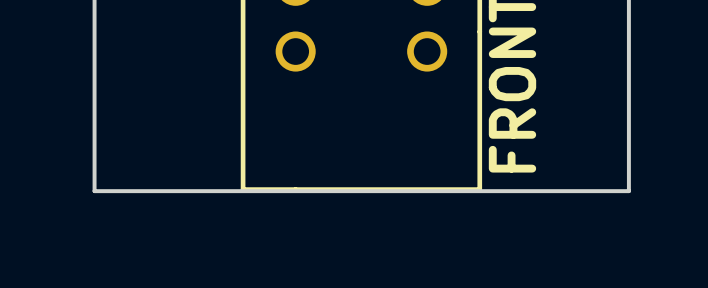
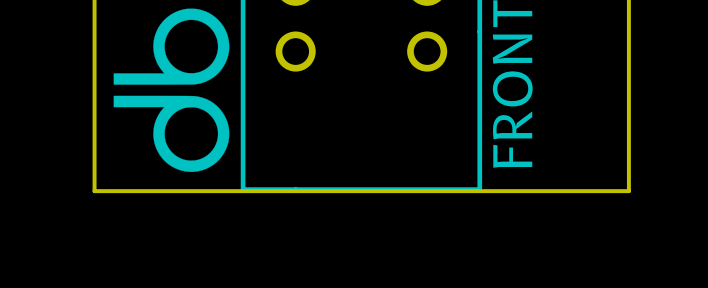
drawing: none -> [113, 8, 230, 172]

